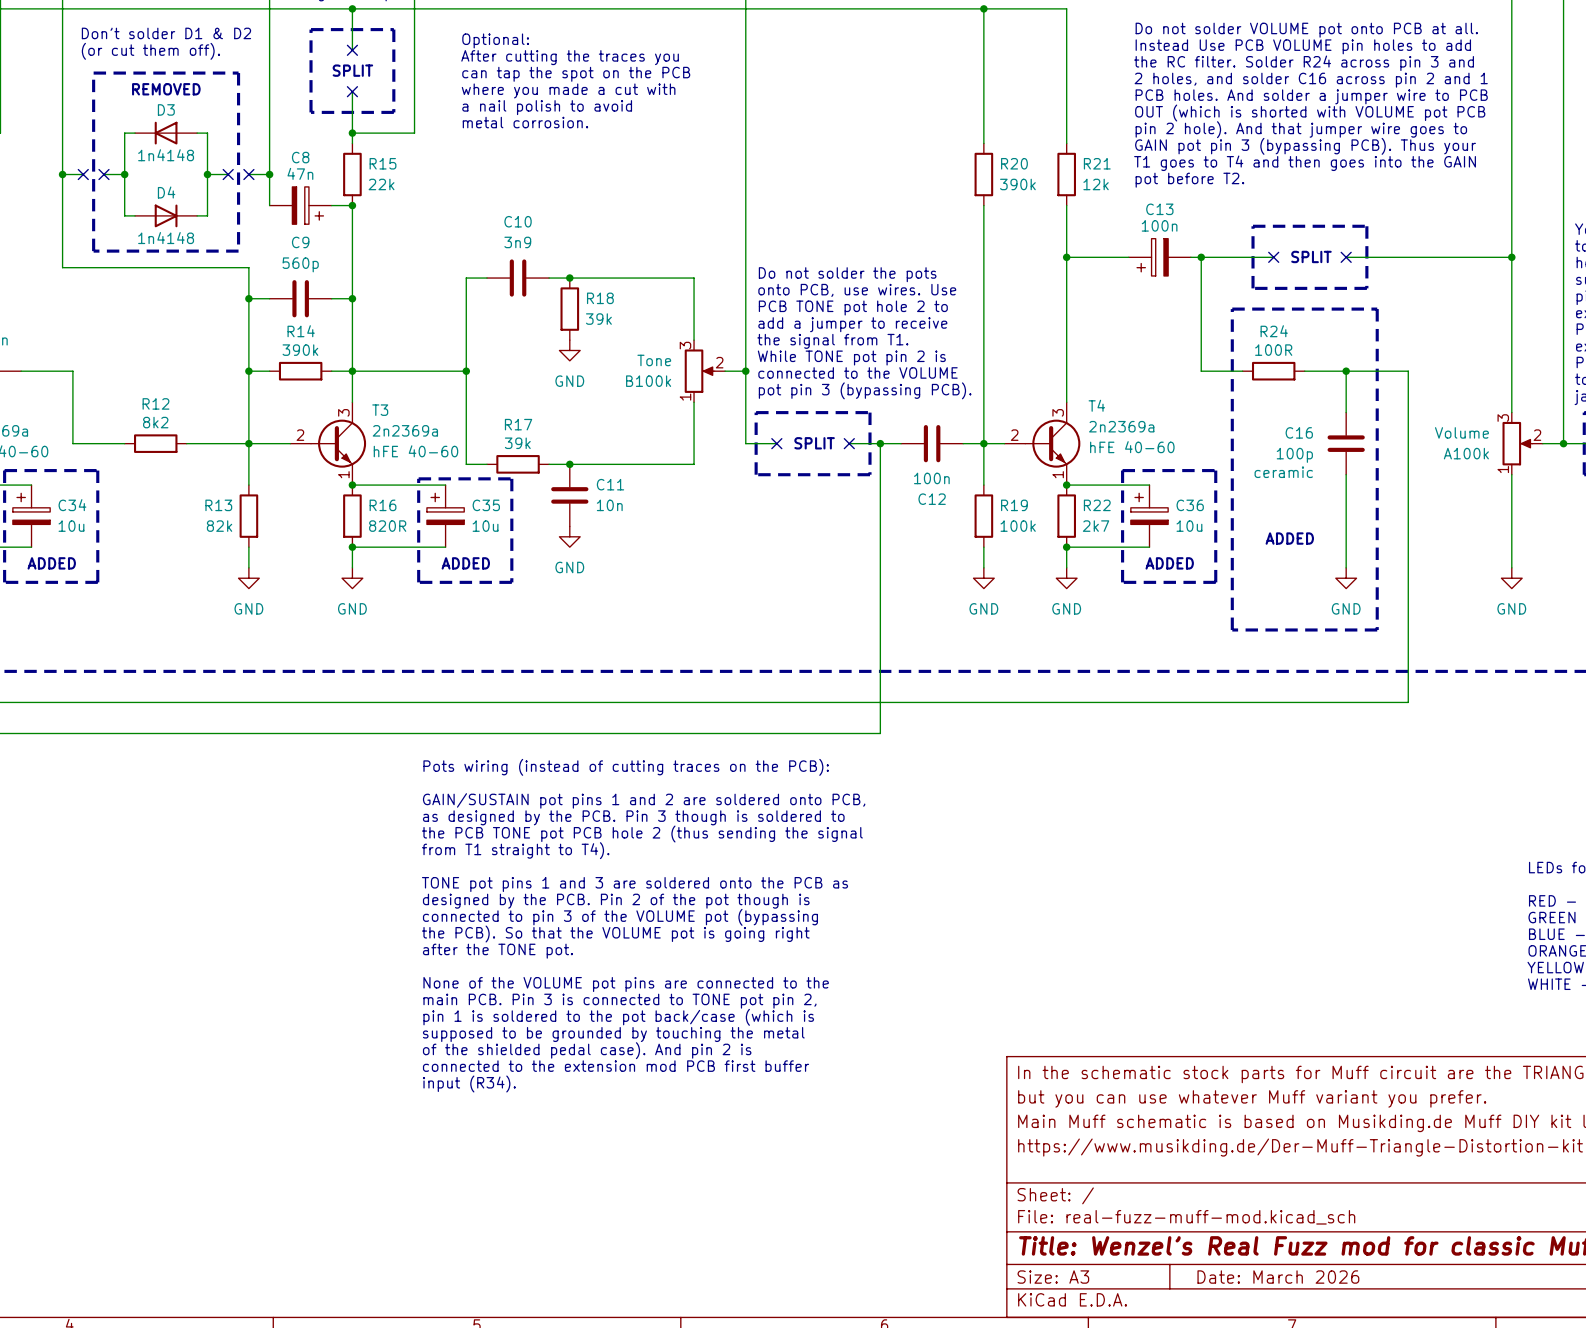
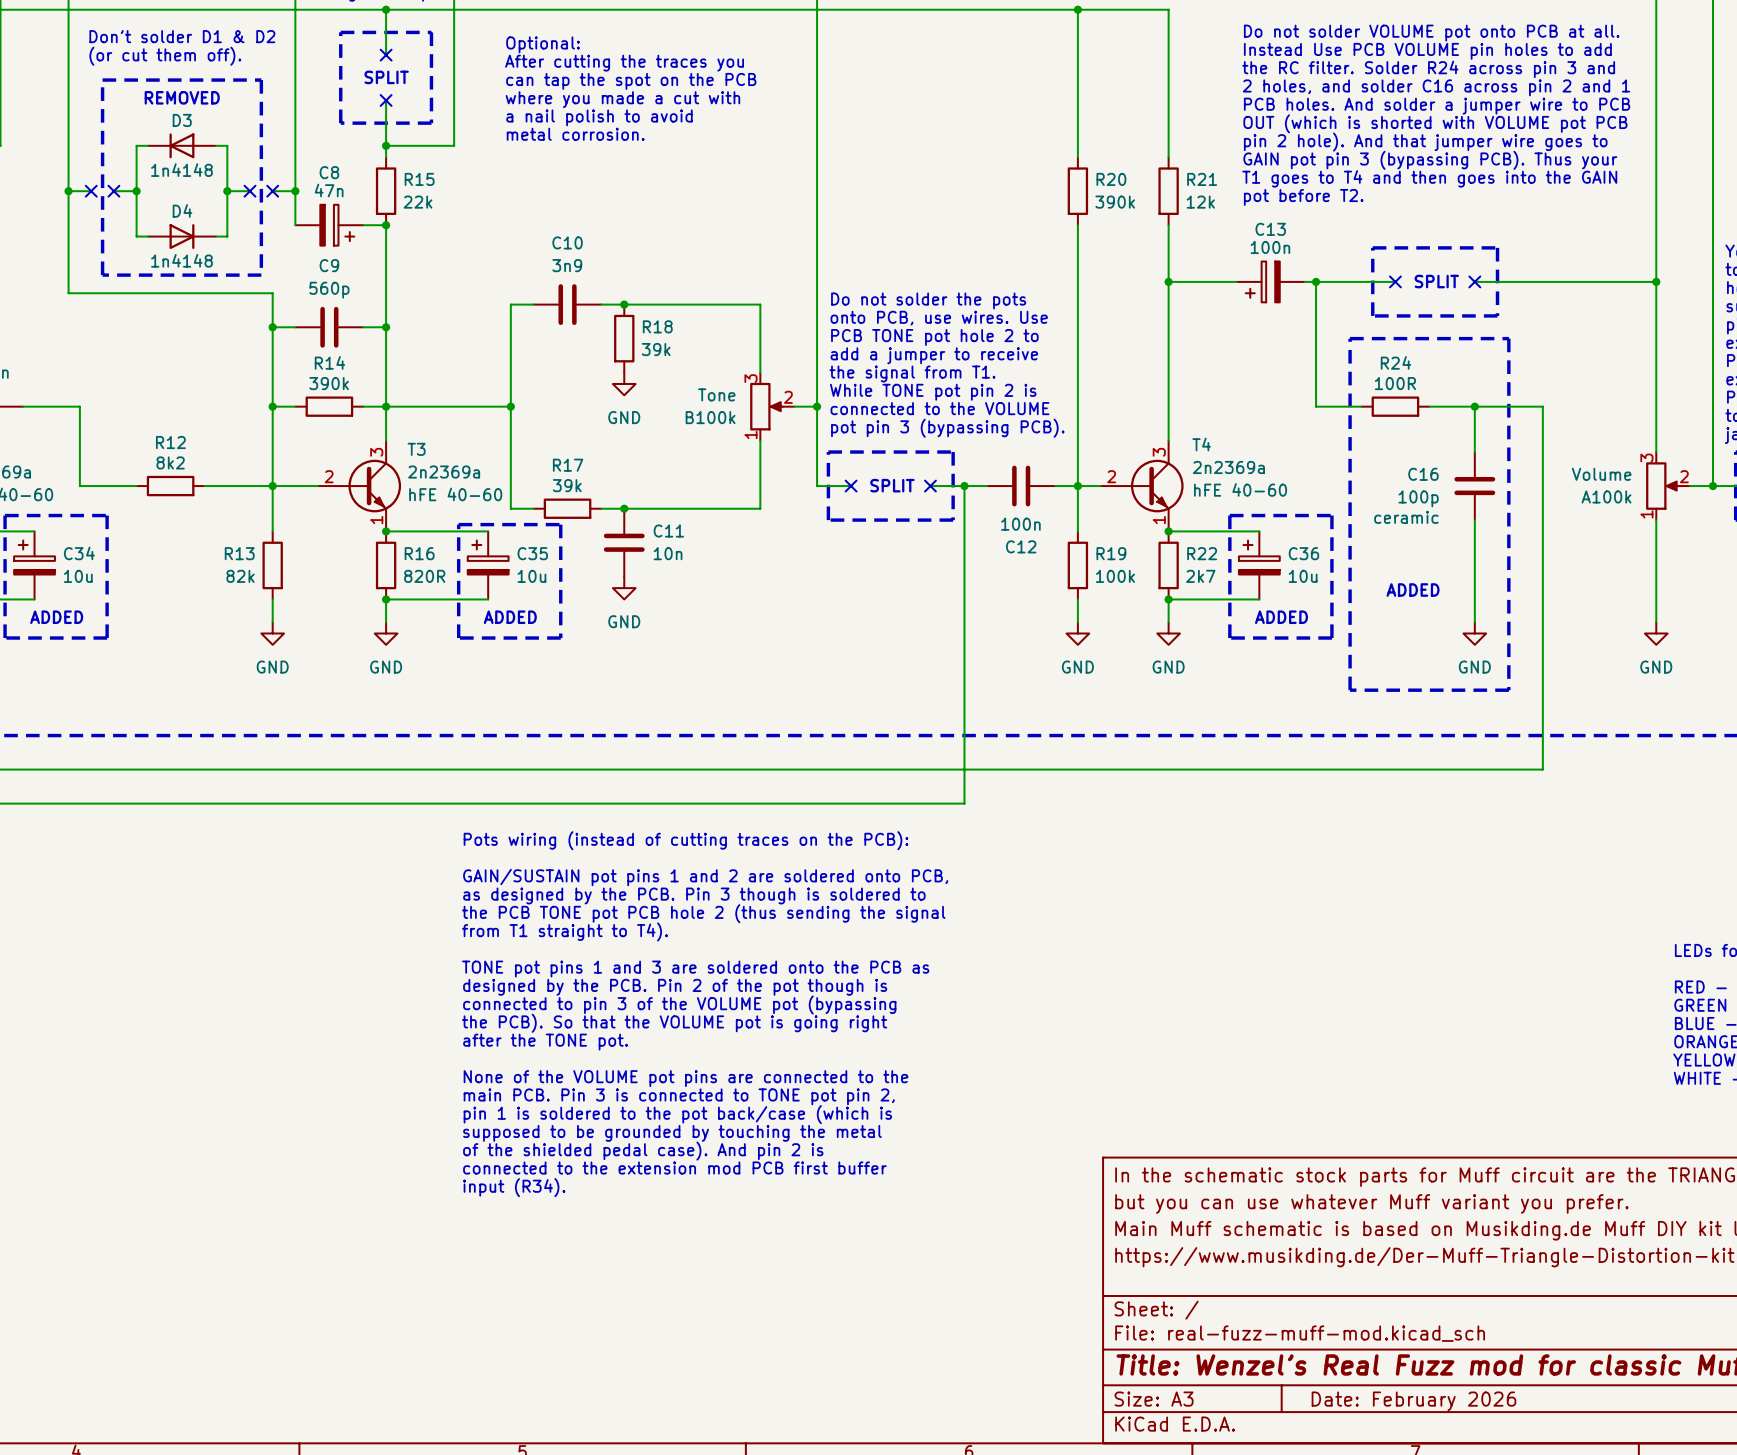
title block: Date: March 2026 (1278, 1277) -> Date: February 2026 (1413, 1401)

